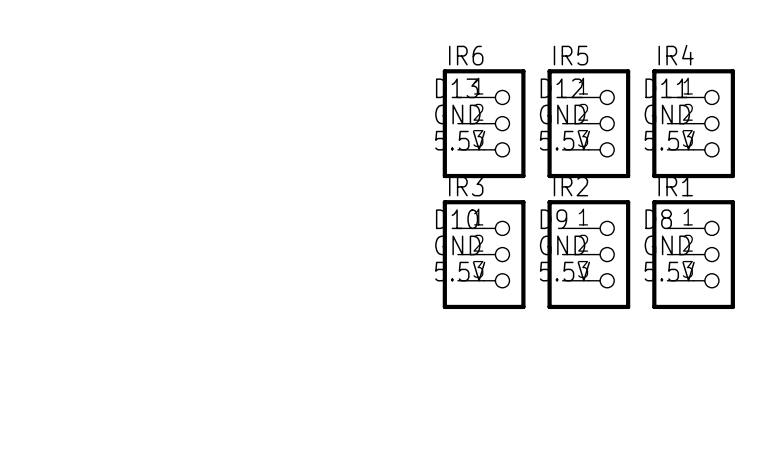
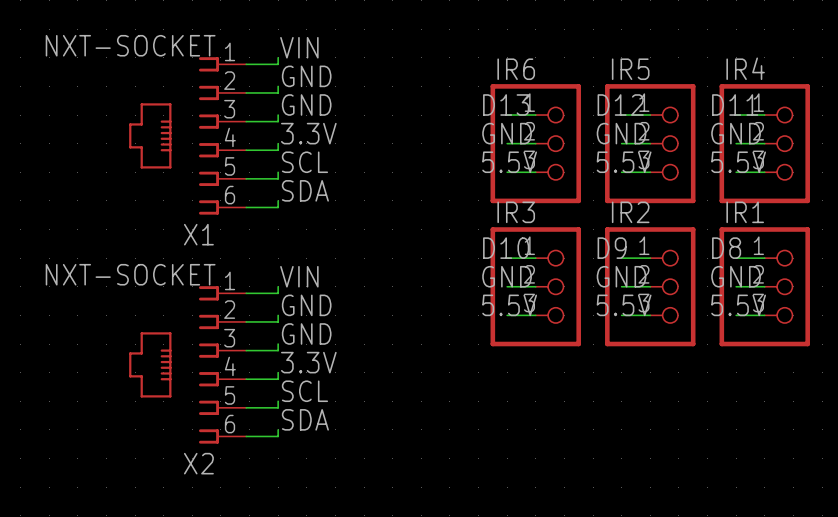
label: none -> VIN (299, 47)
wire: none -> (278, 57) (278, 64) (246, 64)
label: none -> GND (306, 76)
wire: none -> (278, 86) (278, 92) (246, 92)
label: none -> GND (306, 105)
wire: none -> (278, 115) (278, 121) (246, 121)
label: none -> 3.3V (308, 133)
X1: none -> NXT-SOCKET (187, 135)
wire: none -> (278, 143) (278, 150) (246, 150)
label: none -> SCL (304, 162)
wire: none -> (278, 172) (278, 178) (246, 178)
label: none -> SDA (305, 190)
wire: none -> (278, 200) (278, 207) (246, 207)
label: none -> VIN (299, 276)
wire: none -> (278, 286) (278, 293) (246, 293)
label: none -> GND (306, 305)
wire: none -> (278, 315) (278, 321) (246, 321)
label: none -> GND (306, 333)
wire: none -> (278, 344) (278, 350) (246, 350)
label: none -> 3.3V (308, 362)
X2: none -> NXT-SOCKET (187, 364)
wire: none -> (278, 372) (278, 379) (246, 379)
label: none -> SCL (304, 391)
wire: none -> (278, 401) (278, 407) (246, 407)
label: none -> SDA (305, 419)
wire: none -> (278, 429) (278, 436) (246, 436)

